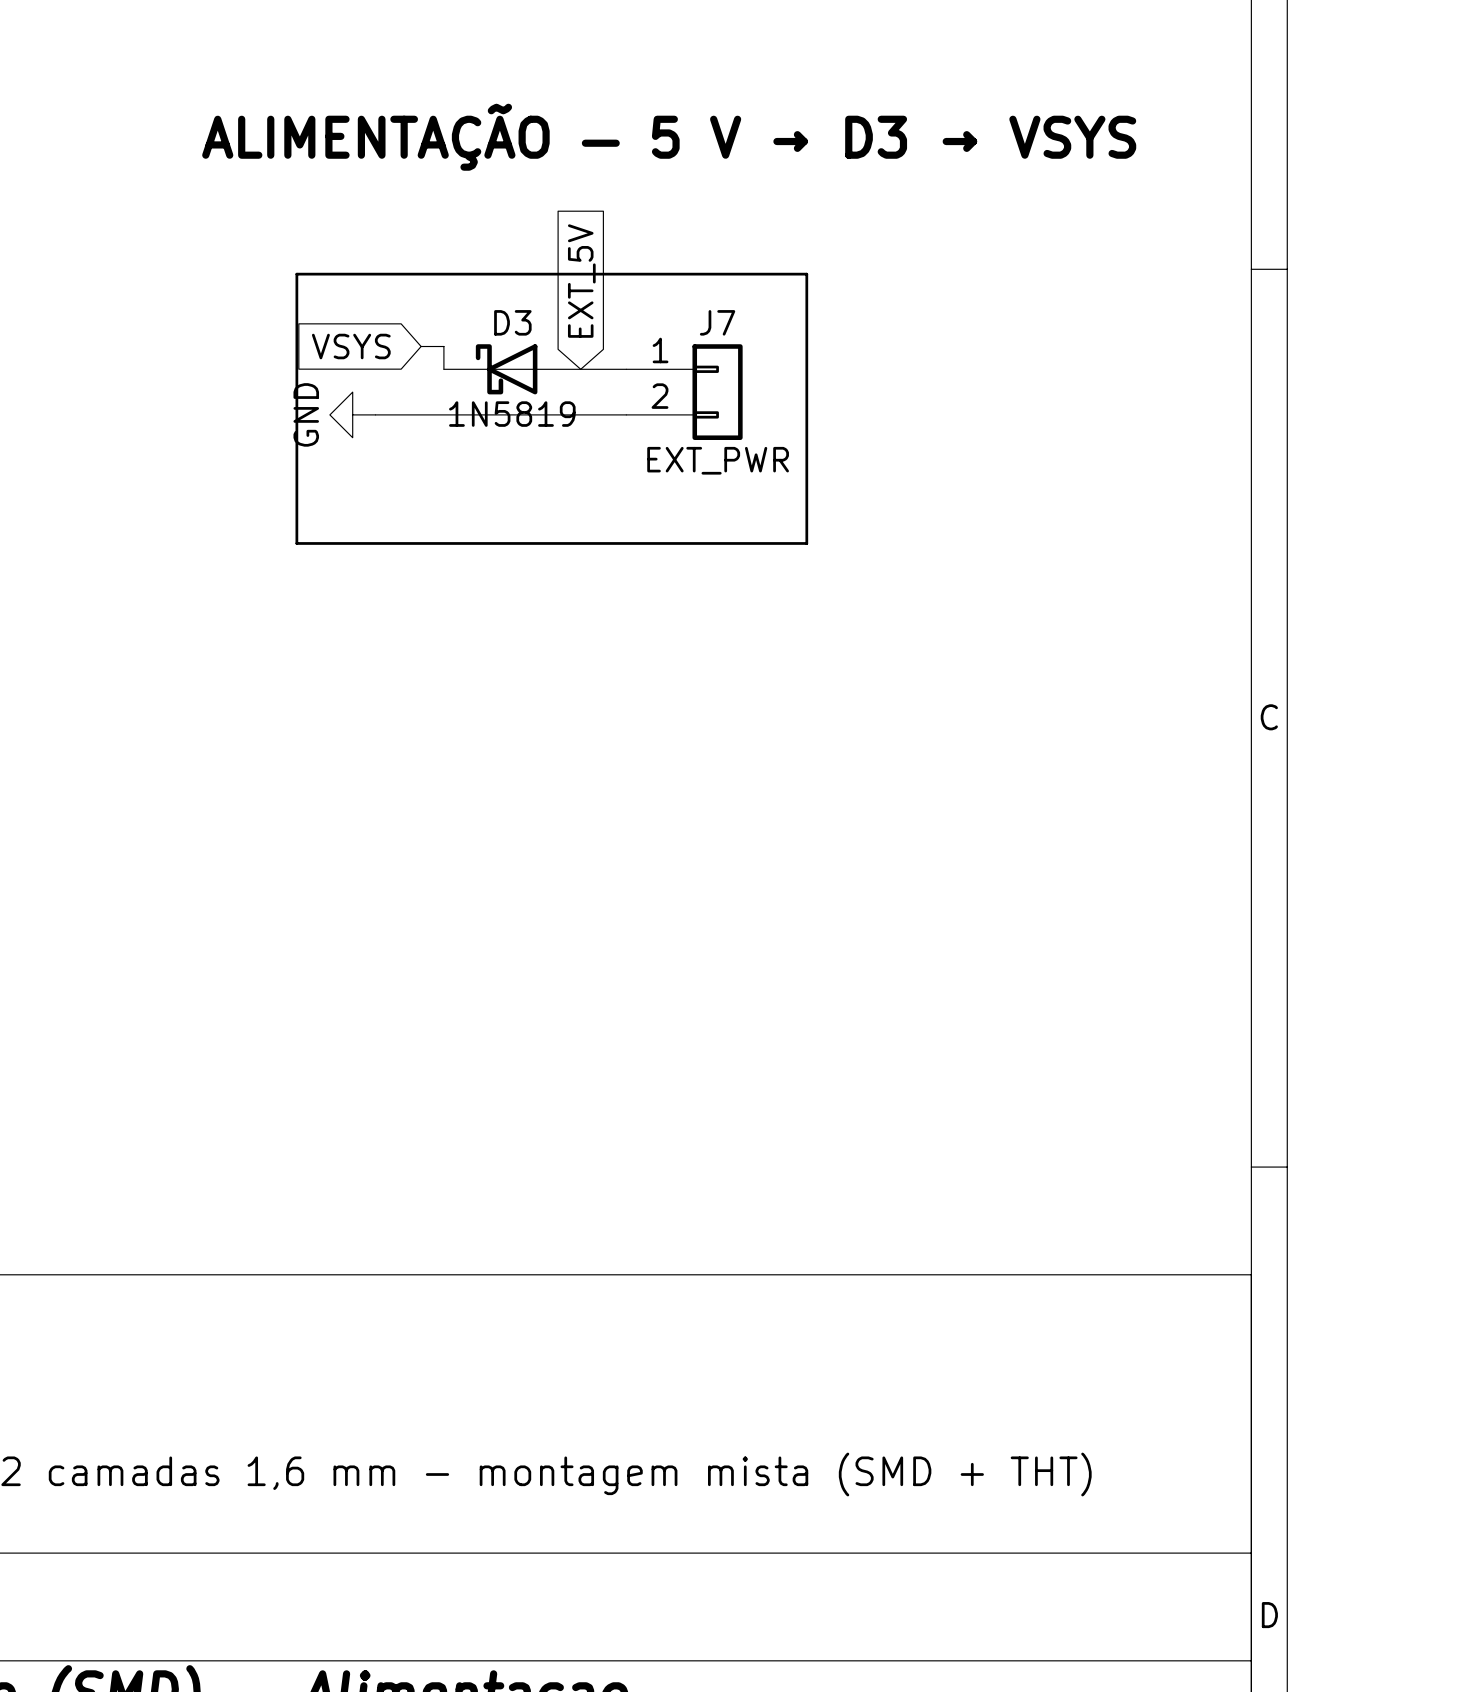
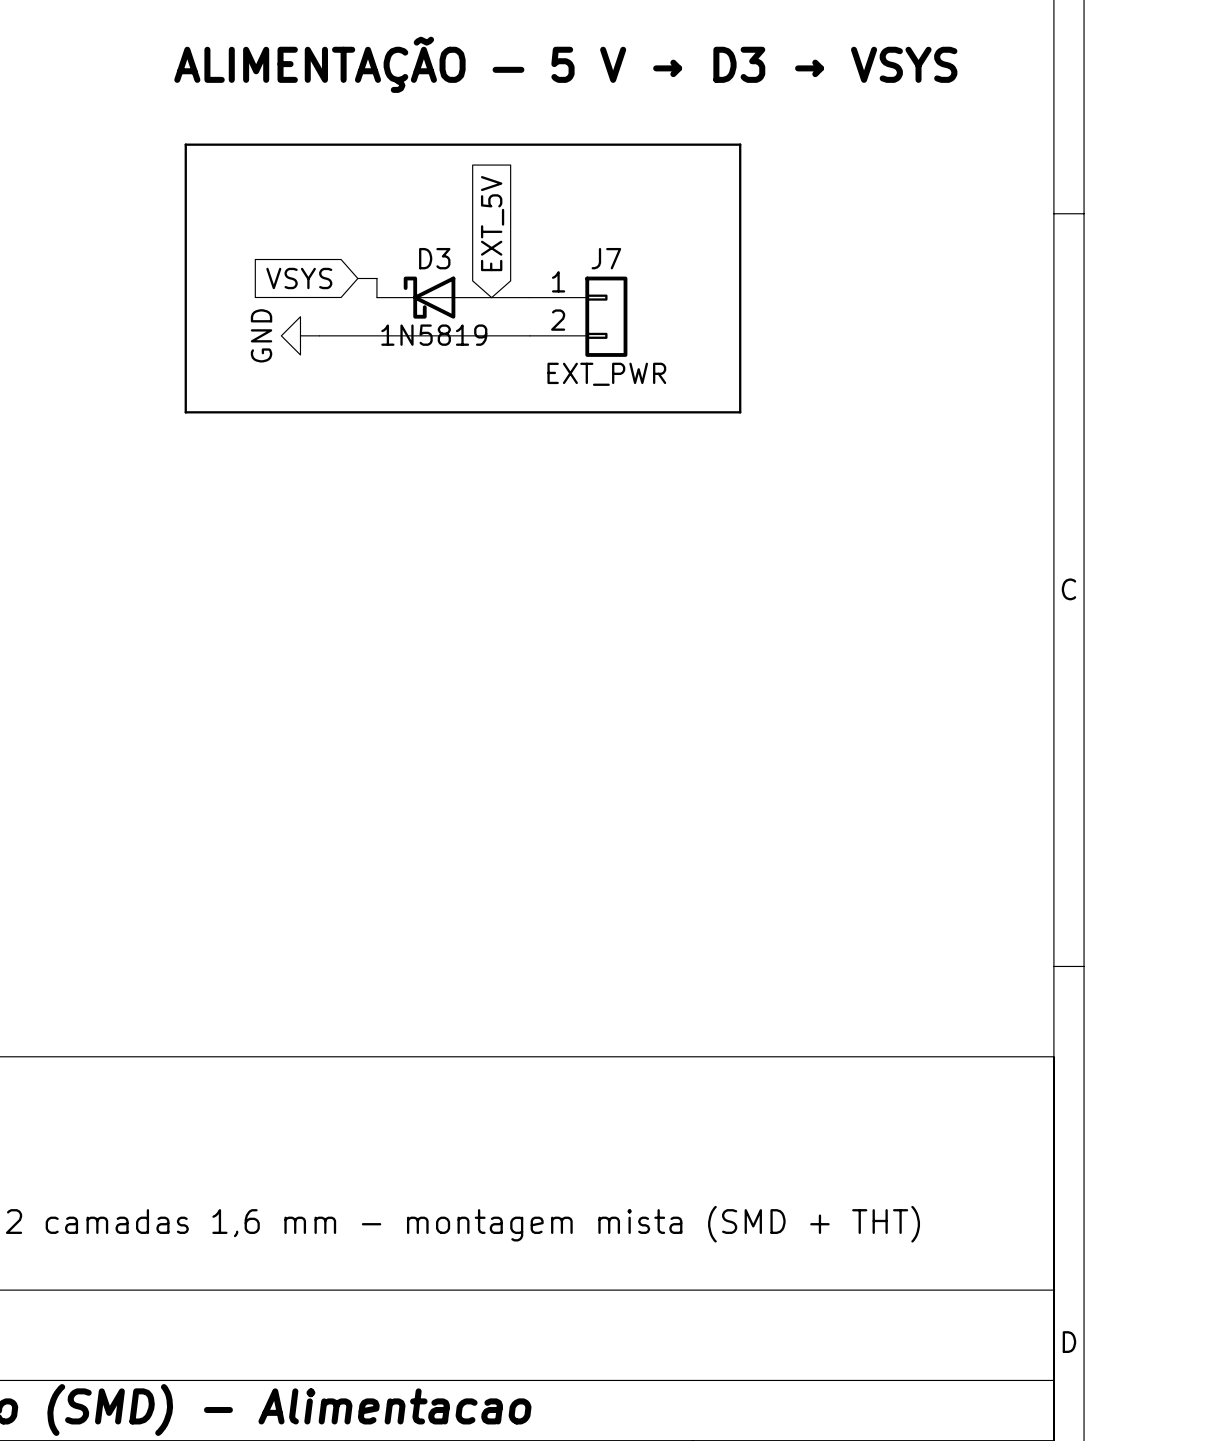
text position: ALIMENTAÇÃO — 5 V → D3 → VSYS (669, 137) -> ALIMENTAÇÃO — 5 V → D3 → VSYS (565, 64)
line: (296, 274) (806, 274) (806, 543) (296, 543) (296, 274) -> (185, 144) (185, 412) (740, 412) (740, 144) (185, 144)

